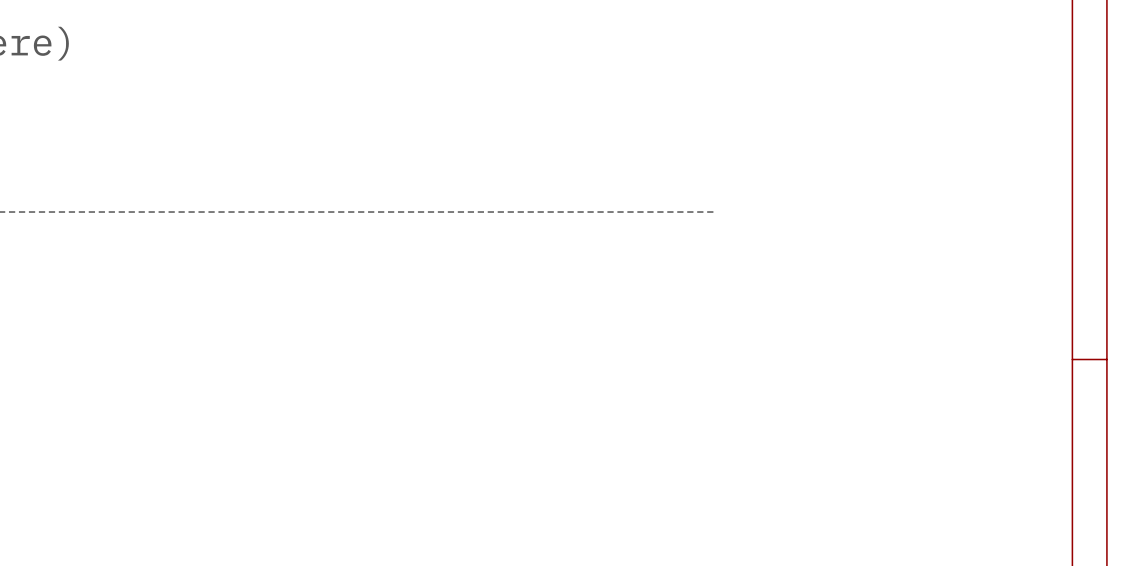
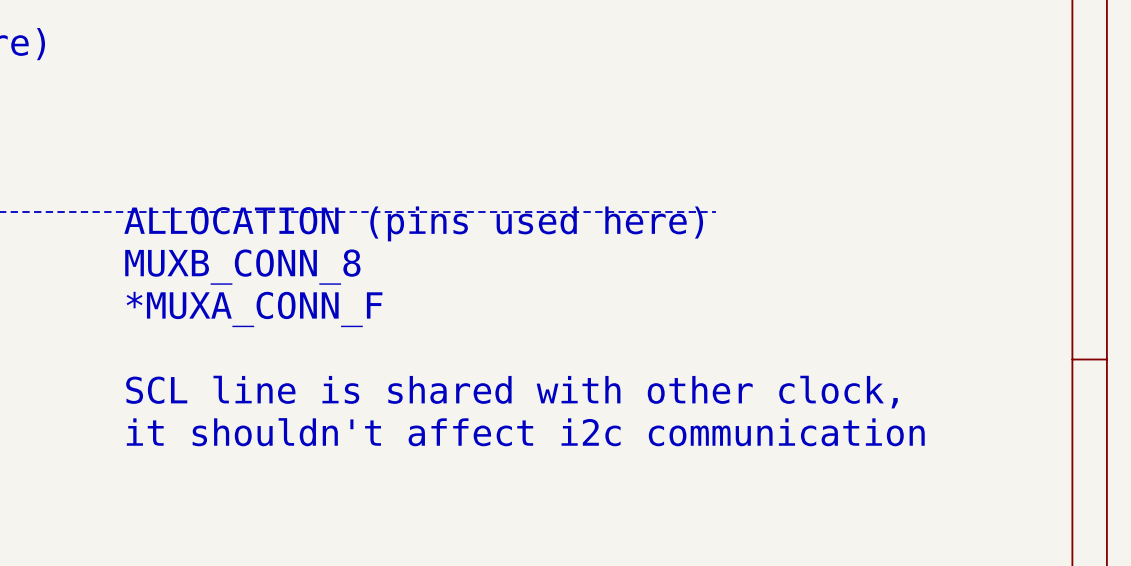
text: none -> ALLOCATION (pins used here) (413, 223)
text: none -> MUXB_CONN_8 (242, 267)
text: none -> *MUXA_CONN_F (254, 309)
text: none -> SCL line is shared with other clock, (511, 392)
text: none -> it shouldn't affect i2c communication (525, 432)

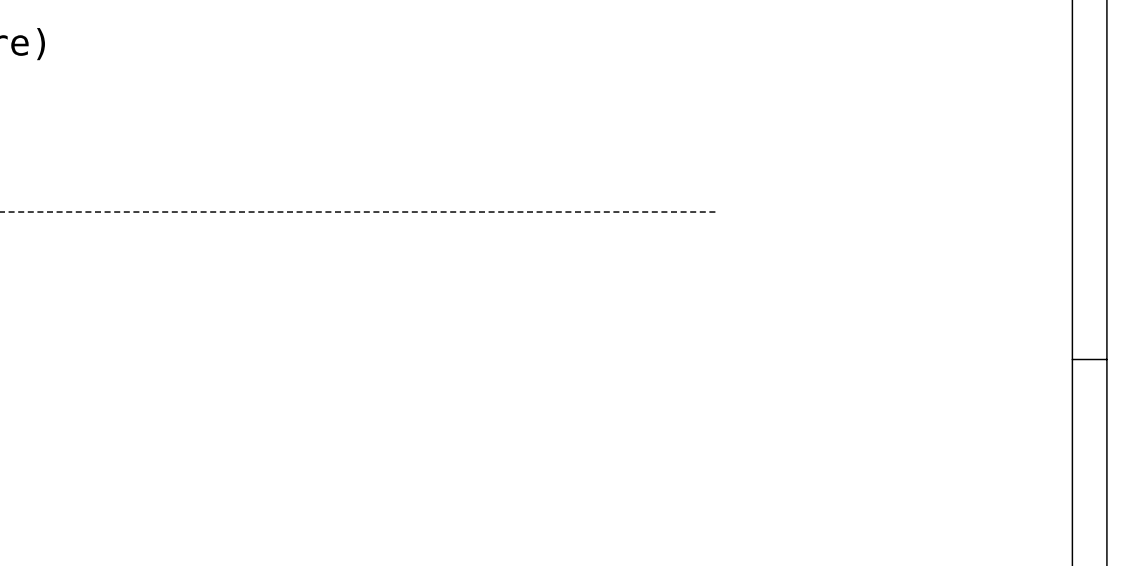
text: ALLOCATION (pins used here) (413, 223) -> none
text: MUXB_CONN_8 (242, 267) -> none
text: *MUXA_CONN_F (254, 309) -> none
text: SCL line is shared with other clock, (511, 392) -> none
text: it shouldn't affect i2c communication (525, 432) -> none

